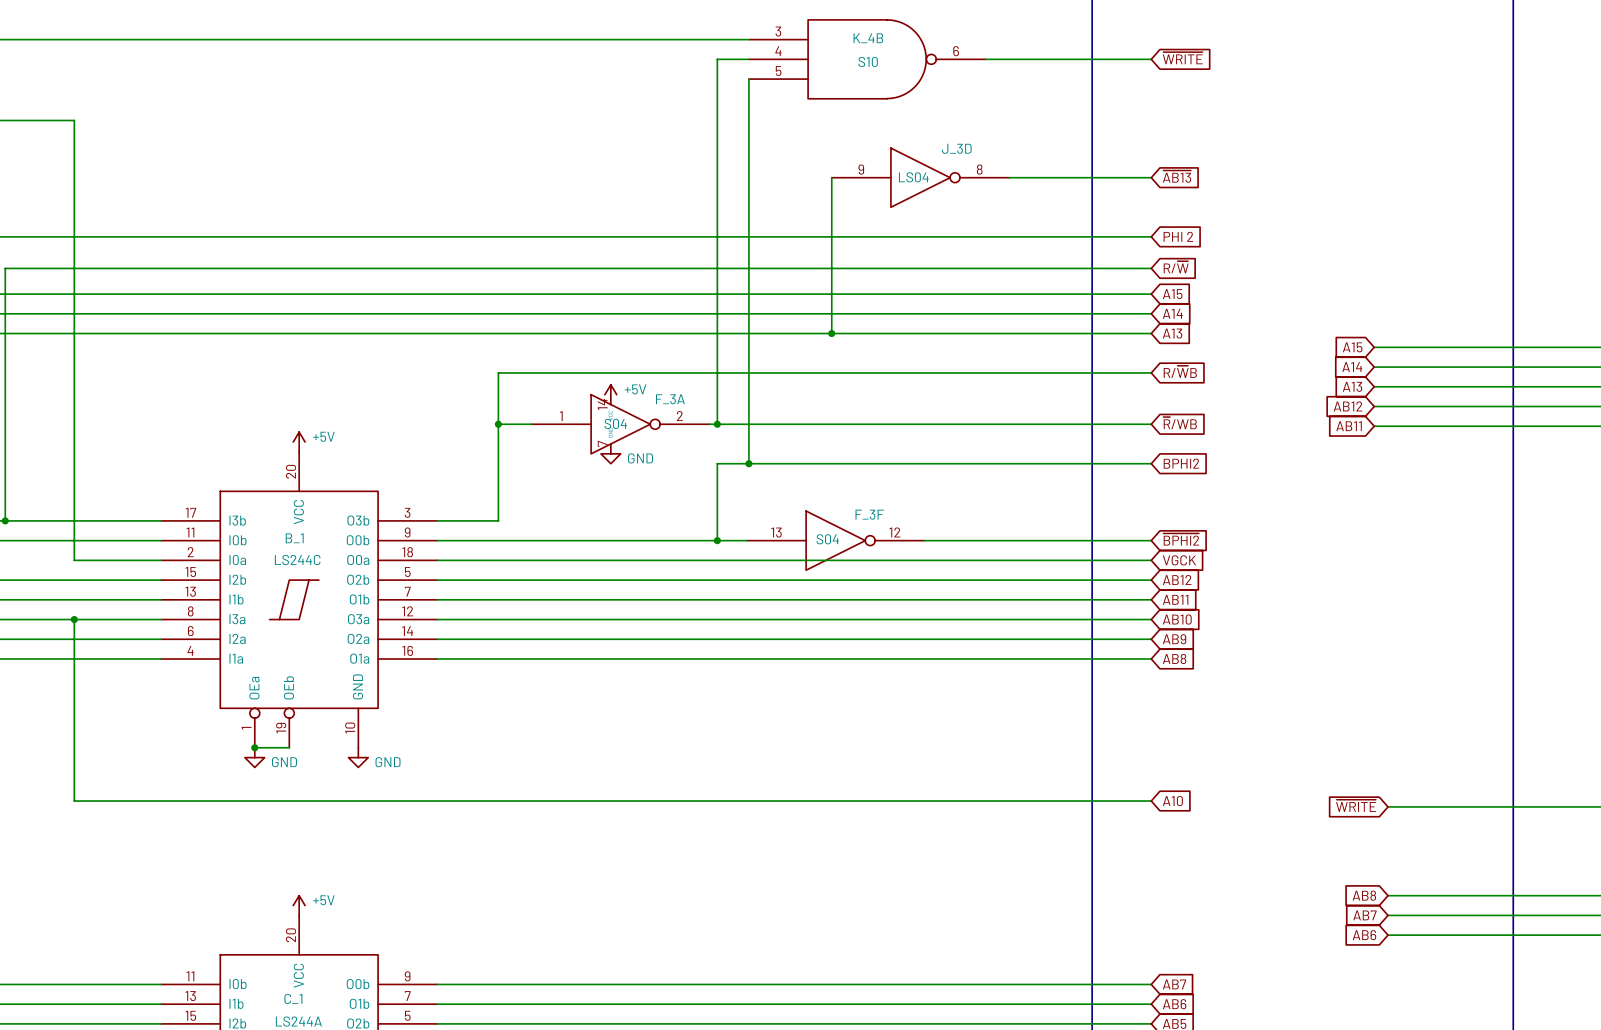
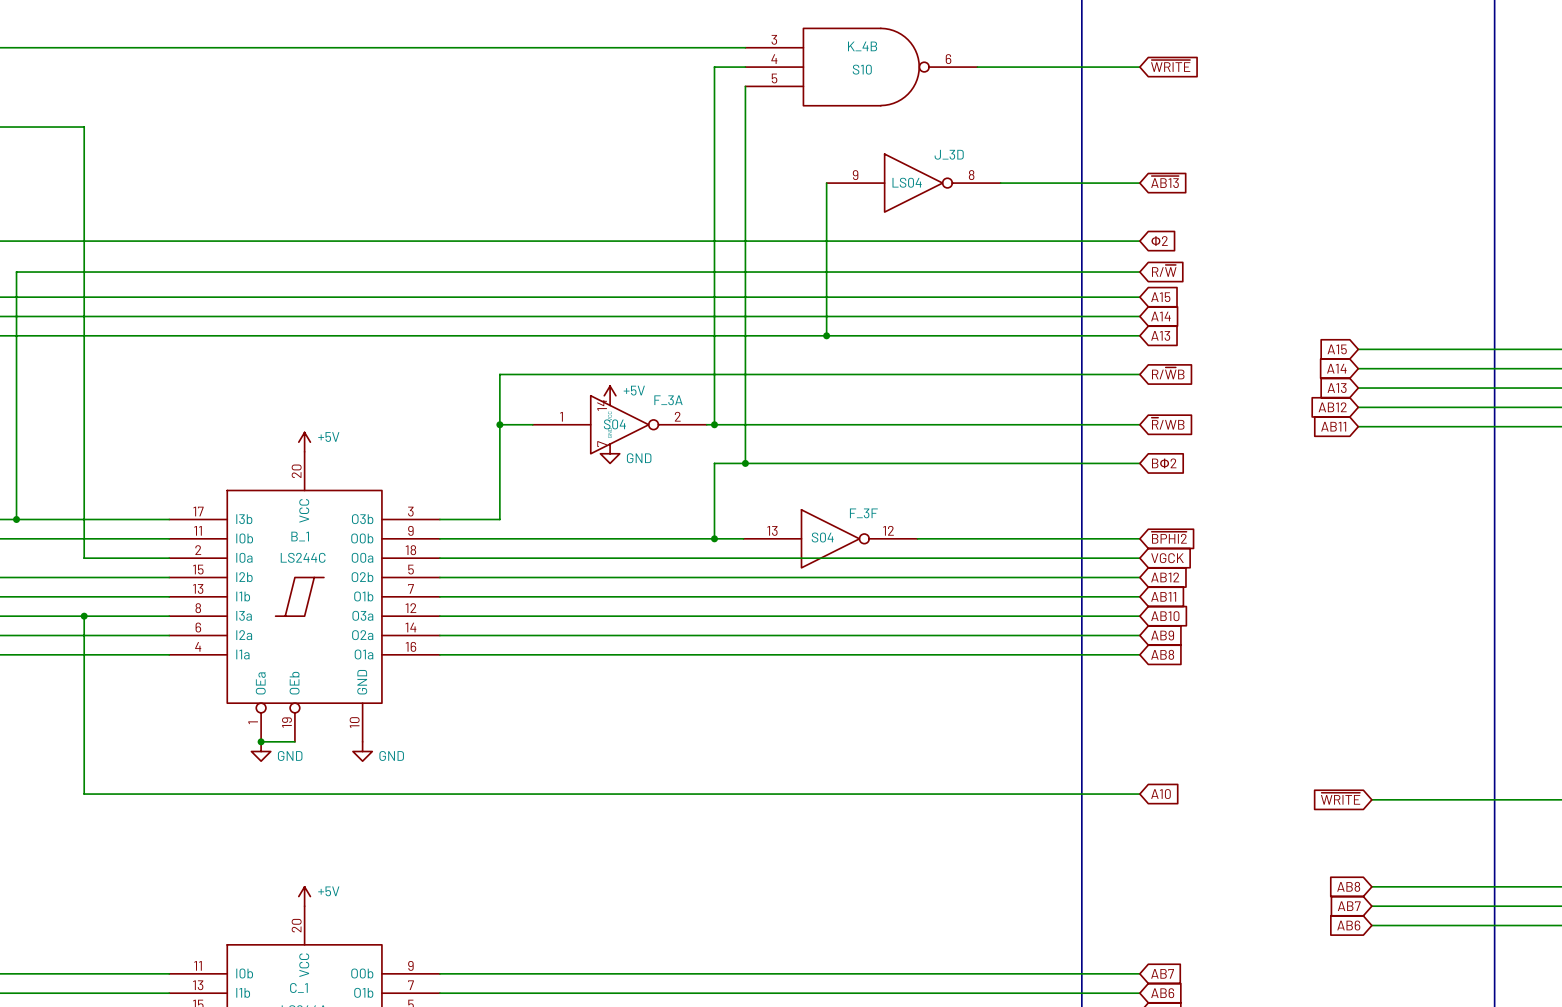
global label: PHI 2 (1178, 236) -> Φ2 (1159, 241)
global label: BPHI2 (1181, 463) -> BΦ2 (1164, 463)

